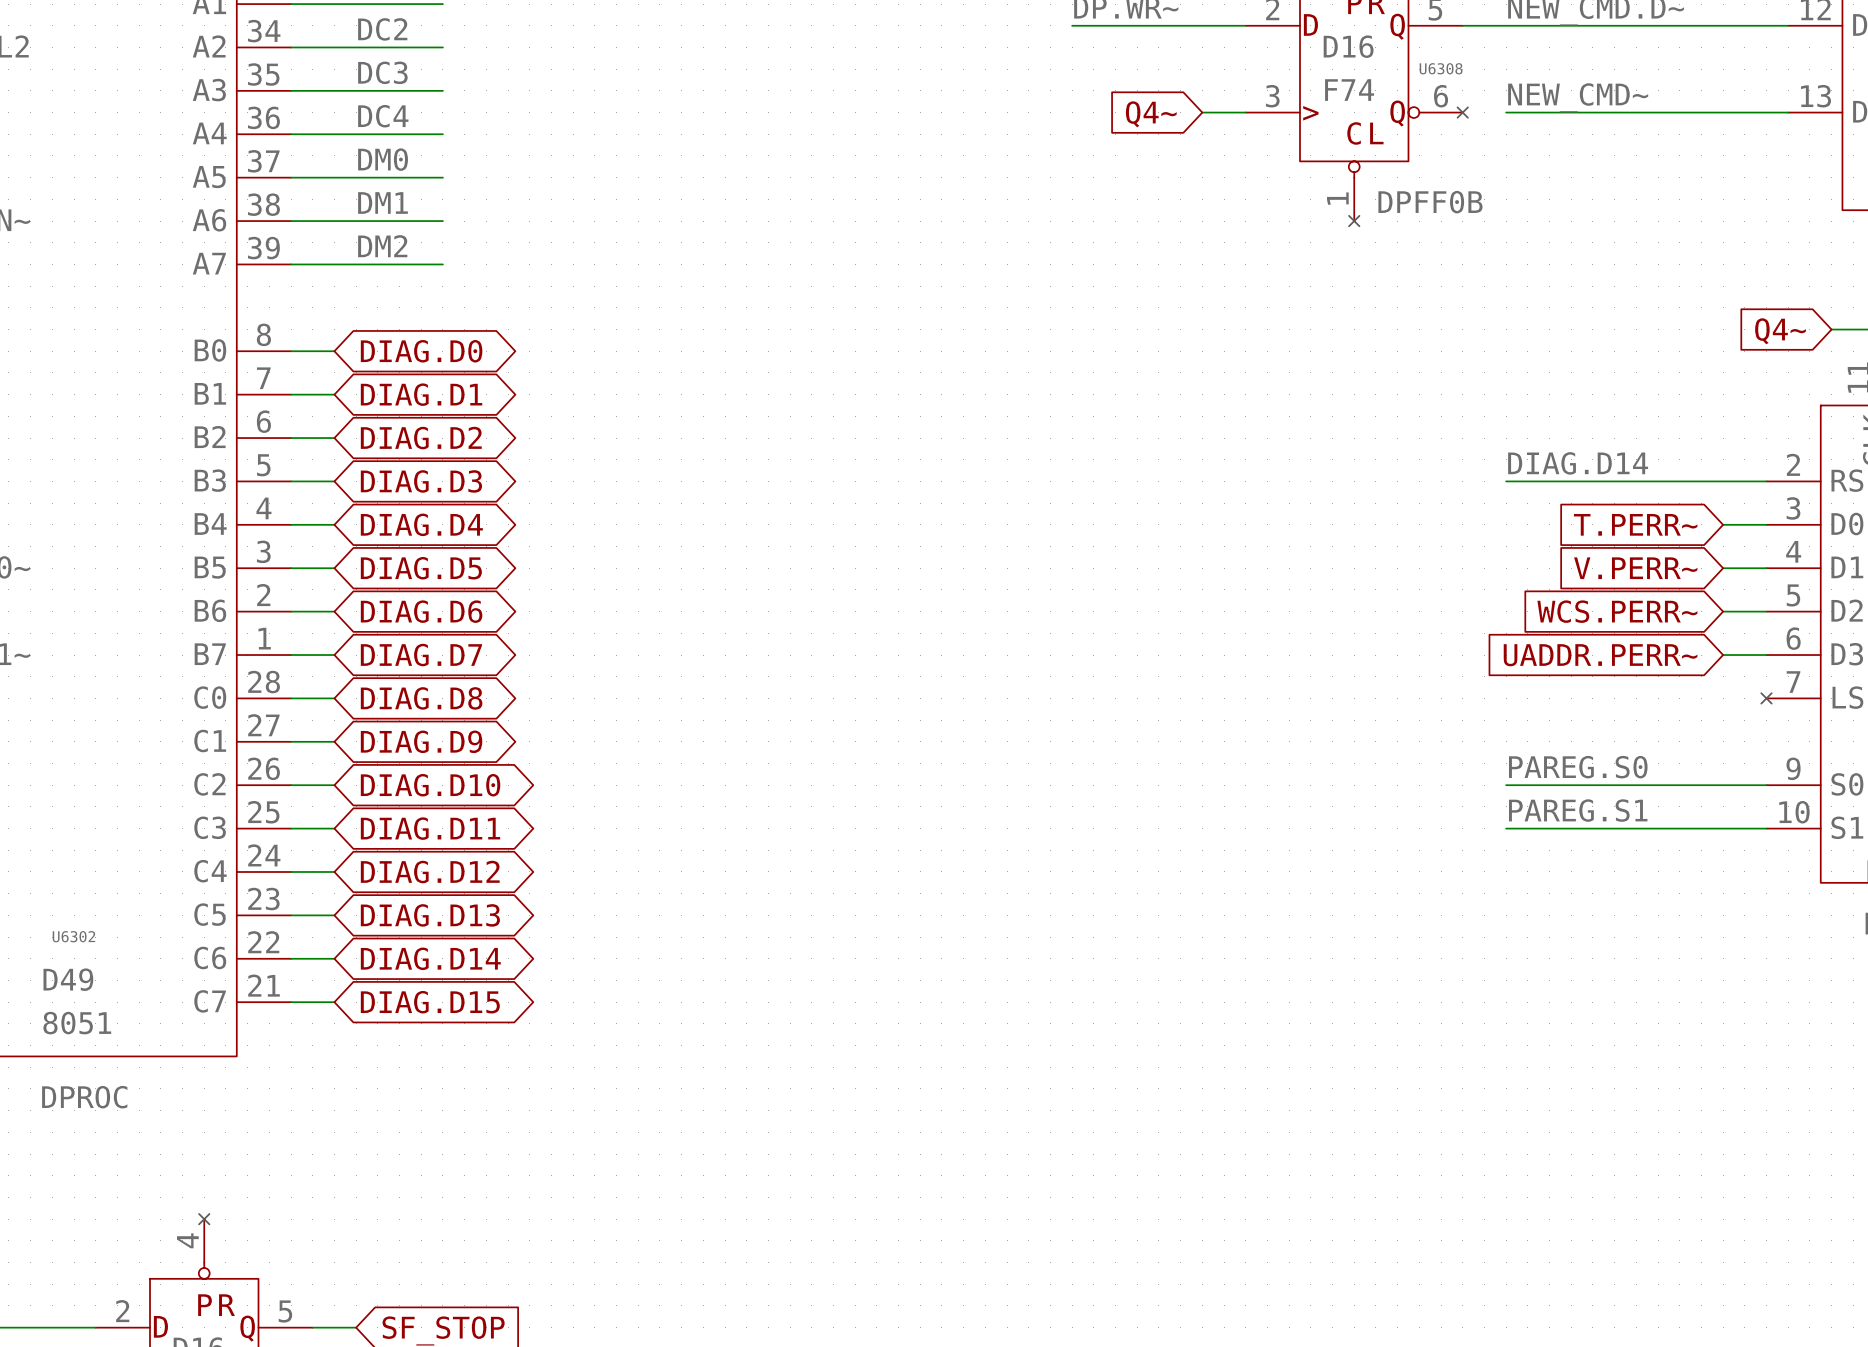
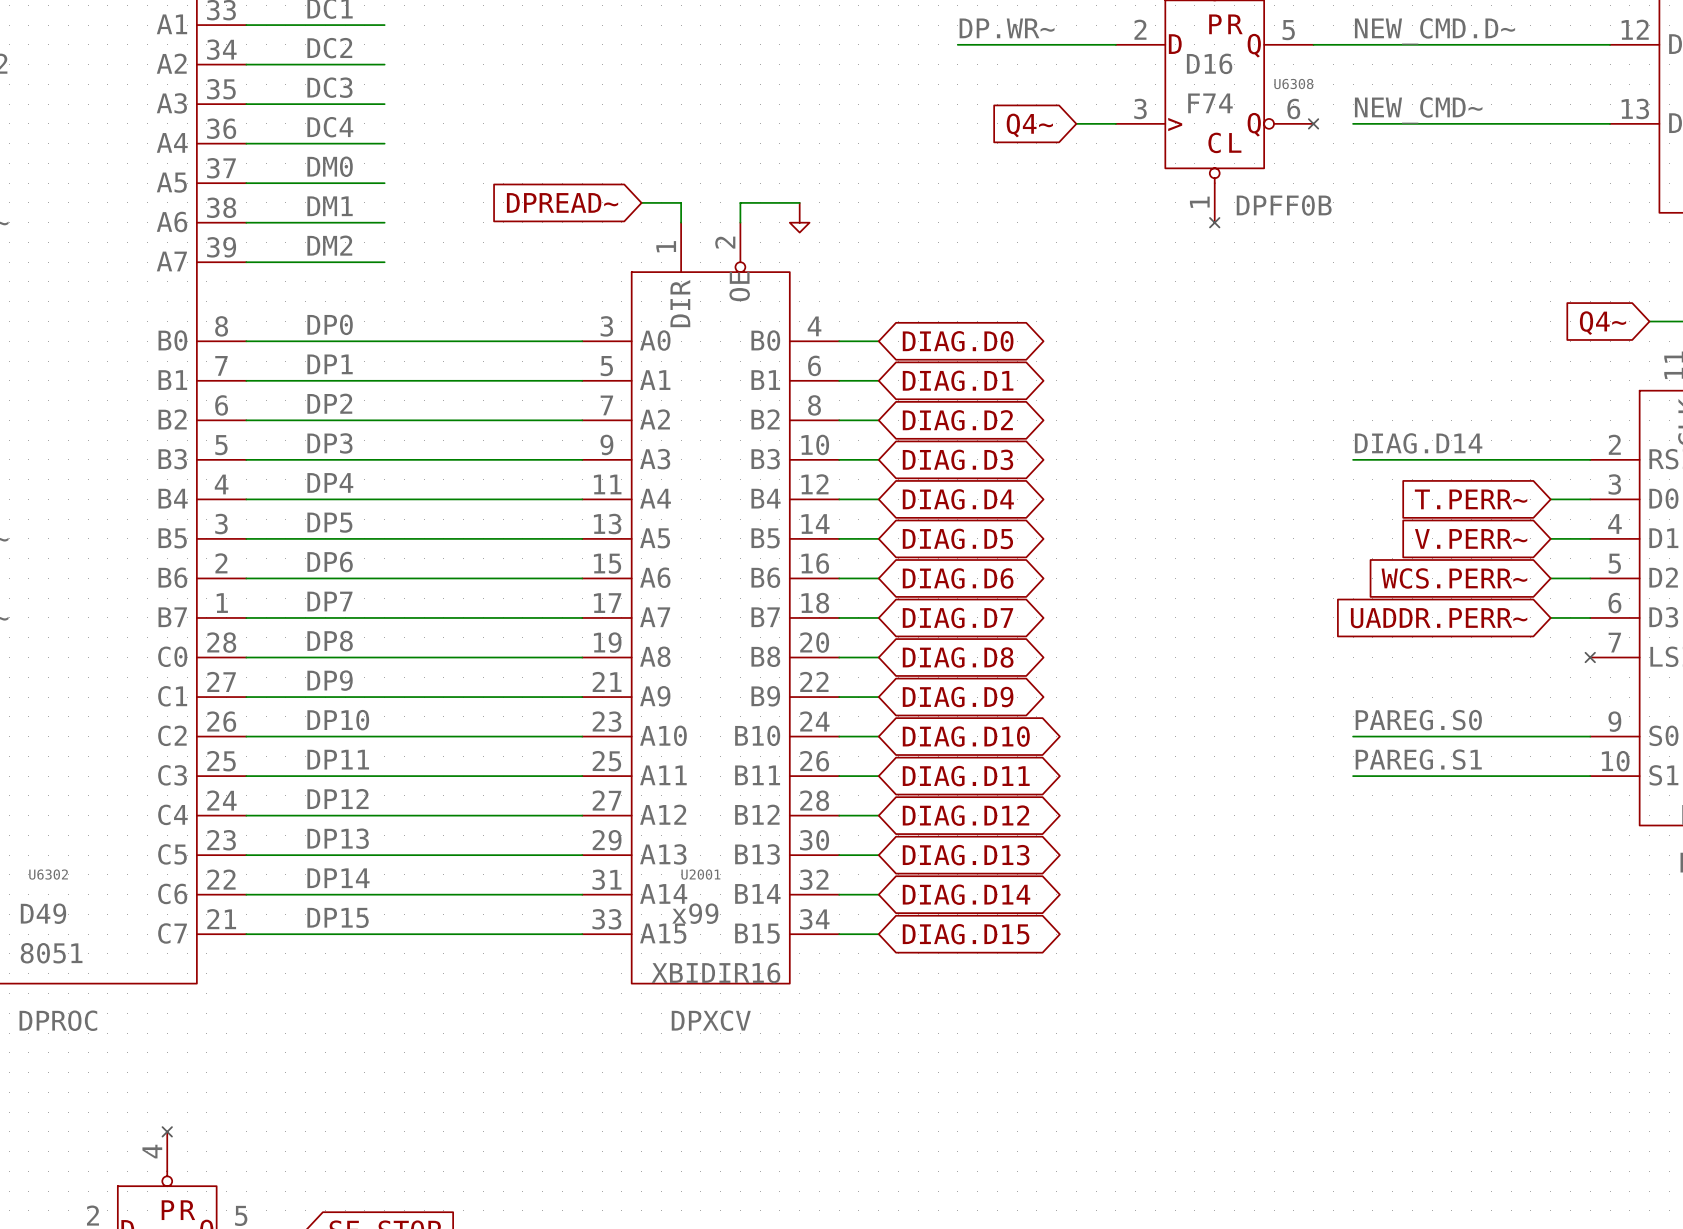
global label: none -> DPREAD~ (562, 202)
wire: none -> (641, 202) (681, 202) (681, 222)
wire: none -> (799, 202) (740, 202) (740, 222)
power symbol: none -> (799, 218)
label: none -> DP0 (330, 324)
wire: none -> (285, 341) (582, 341)
global label: DIAG.D0 (421, 351) -> none
wire: none -> (839, 341) (878, 341)
global label: none -> DIAG.D0 (958, 341)
label: none -> DP1 (330, 364)
wire: none -> (285, 380) (582, 380)
global label: DIAG.D1 (421, 394) -> none
wire: none -> (839, 380) (878, 380)
global label: none -> DIAG.D1 (958, 380)
label: none -> DP2 (329, 403)
wire: none -> (285, 420) (582, 420)
global label: DIAG.D2 (421, 438) -> none
wire: none -> (839, 420) (878, 420)
global label: none -> DIAG.D2 (957, 420)
label: none -> DP3 (329, 443)
wire: none -> (285, 459) (582, 459)
global label: DIAG.D3 (421, 481) -> none
wire: none -> (839, 459) (878, 459)
global label: none -> DIAG.D3 (957, 459)
label: none -> DP4 (330, 482)
wire: none -> (285, 499) (582, 499)
global label: DIAG.D4 (421, 524) -> none
wire: none -> (839, 499) (878, 499)
global label: none -> DIAG.D4 (958, 499)
label: none -> DP5 (329, 522)
wire: none -> (285, 538) (582, 538)
global label: DIAG.D5 (421, 568) -> none
wire: none -> (839, 538) (878, 538)
global label: none -> DIAG.D5 (957, 538)
label: none -> DP6 (330, 562)
wire: none -> (285, 578) (582, 578)
global label: DIAG.D6 (421, 611) -> none
wire: none -> (839, 578) (878, 578)
global label: none -> DIAG.D6 (958, 578)
label: none -> DP7 (329, 601)
U2001: none -> XBIDIR16 (710, 603)
wire: none -> (285, 617) (582, 617)
global label: DIAG.D7 (421, 655) -> none
wire: none -> (839, 617) (878, 617)
global label: none -> DIAG.D7 (957, 617)
label: none -> DP8 (330, 641)
wire: none -> (285, 657) (582, 657)
global label: DIAG.D8 (421, 698) -> none
wire: none -> (839, 657) (878, 657)
global label: none -> DIAG.D8 (958, 657)
label: none -> DP9 (330, 680)
wire: none -> (285, 697) (582, 697)
global label: DIAG.D9 (421, 741) -> none
wire: none -> (839, 697) (878, 697)
global label: none -> DIAG.D9 (958, 697)
label: none -> DP10 (338, 720)
wire: none -> (285, 736) (582, 736)
global label: DIAG.D10 (430, 785) -> none
wire: none -> (839, 736) (878, 736)
global label: none -> DIAG.D10 (966, 736)
label: none -> DP11 (338, 759)
wire: none -> (285, 776) (582, 776)
global label: DIAG.D11 (430, 828) -> none
wire: none -> (839, 776) (878, 776)
global label: none -> DIAG.D11 (966, 776)
label: none -> DP12 (337, 798)
wire: none -> (285, 815) (582, 815)
wire: none -> (839, 815) (878, 815)
global label: DIAG.D12 (430, 872) -> none
global label: none -> DIAG.D12 (966, 815)
label: none -> DP13 (338, 838)
wire: none -> (285, 855) (582, 855)
global label: DIAG.D13 (430, 915) -> none
wire: none -> (839, 855) (878, 855)
global label: none -> DIAG.D13 (966, 855)
label: none -> DP14 (338, 878)
wire: none -> (285, 894) (582, 894)
global label: DIAG.D14 (430, 958) -> none
wire: none -> (839, 894) (878, 894)
global label: none -> DIAG.D14 (966, 894)
label: none -> DP15 (338, 917)
wire: none -> (285, 934) (582, 934)
global label: DIAG.D15 (430, 1002) -> none
wire: none -> (839, 934) (878, 934)
global label: none -> DIAG.D15 (966, 934)

